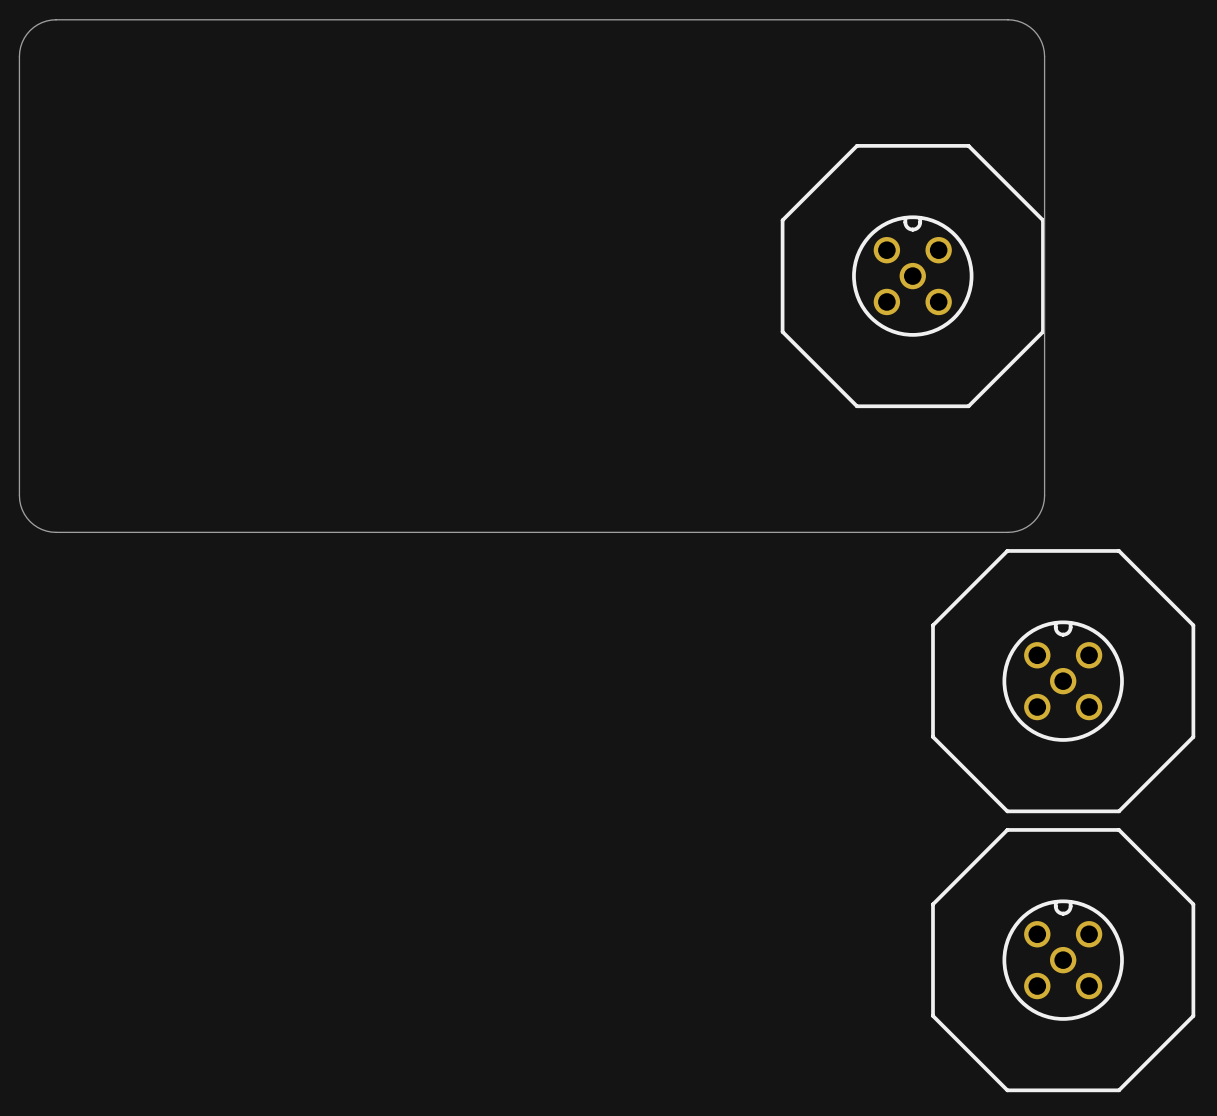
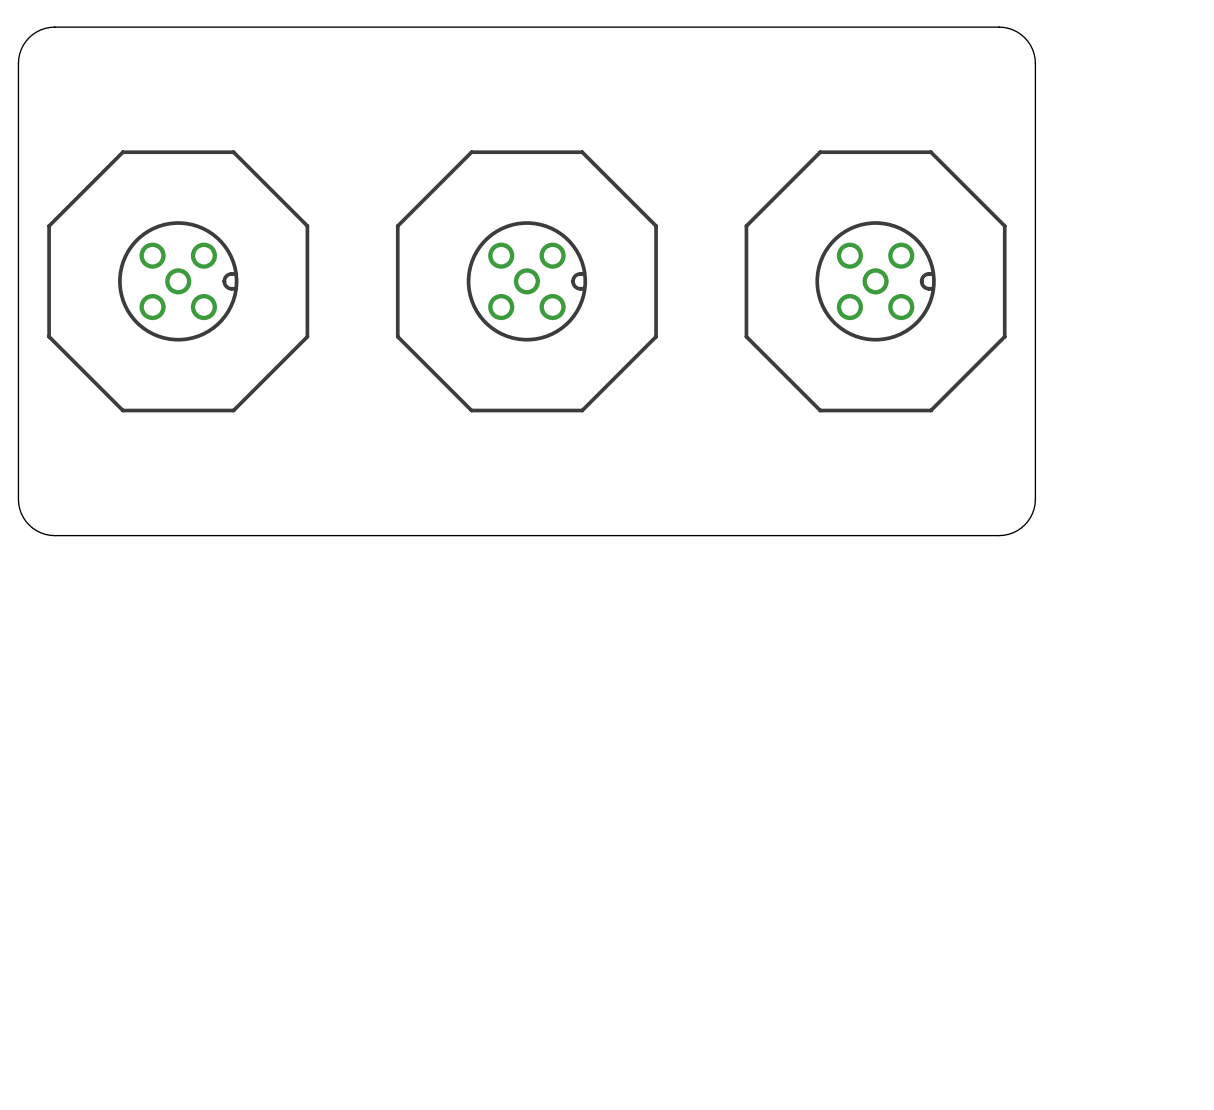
part: none -> (178, 281)
part: none -> (526, 281)
part rotation: 0° (912, 276) -> 90° clockwise (875, 281)
part: (1063, 681) -> none
part: (1063, 960) -> none

